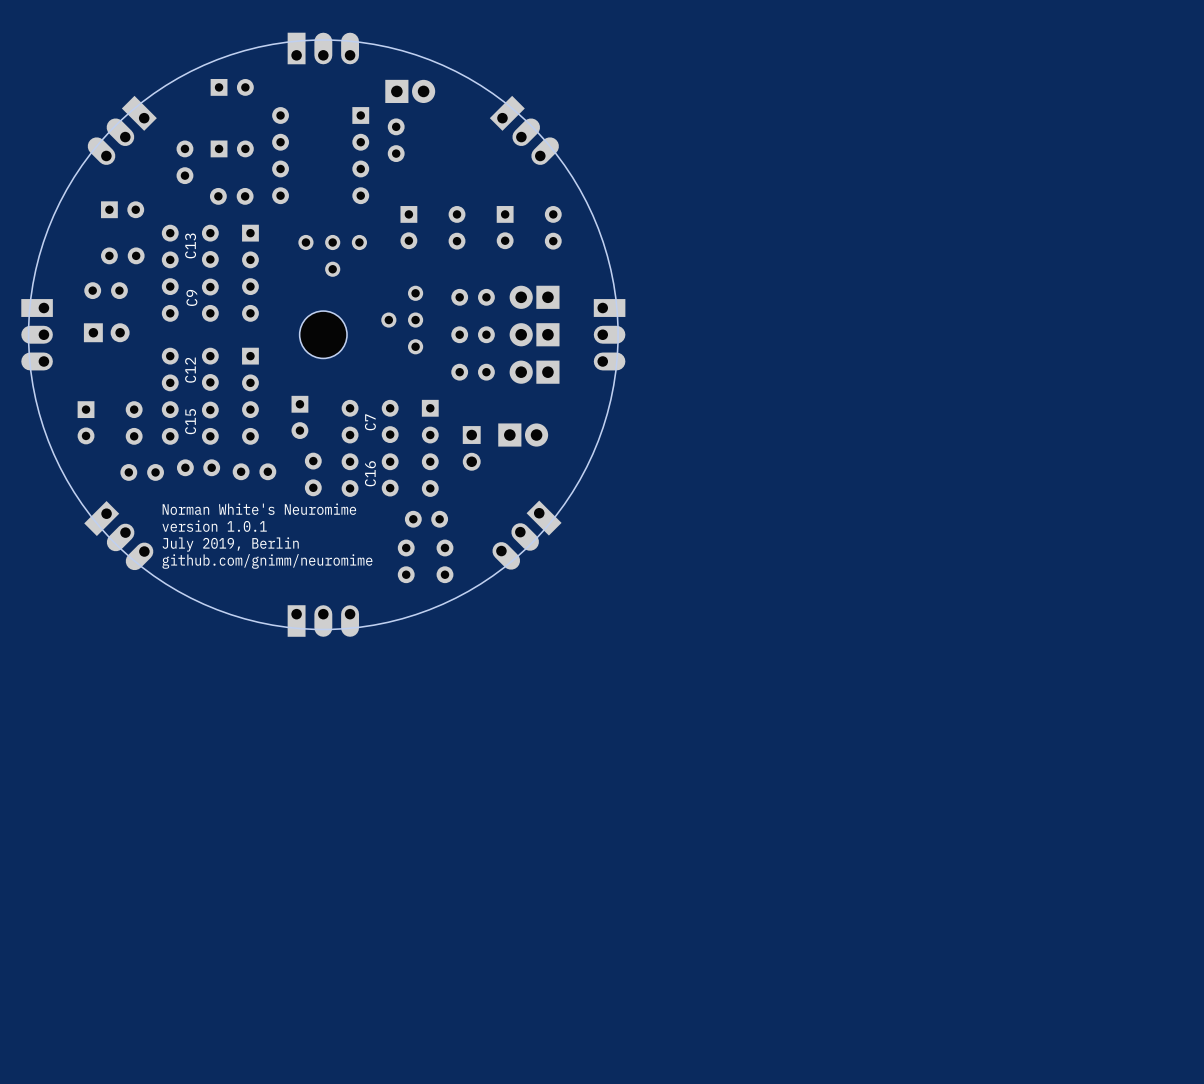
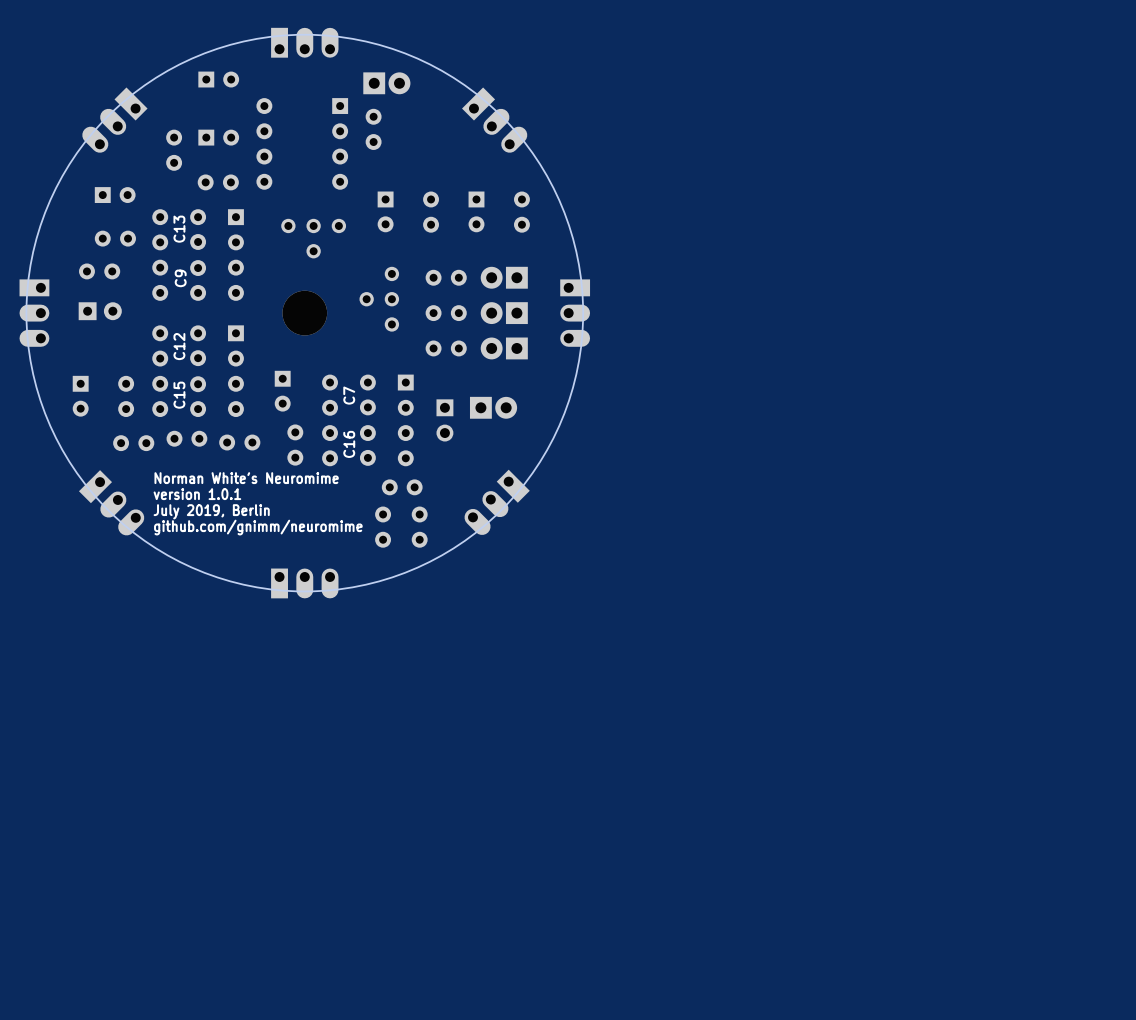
part footprint: [299, 311, 348, 359] -> [282, 290, 328, 336]

